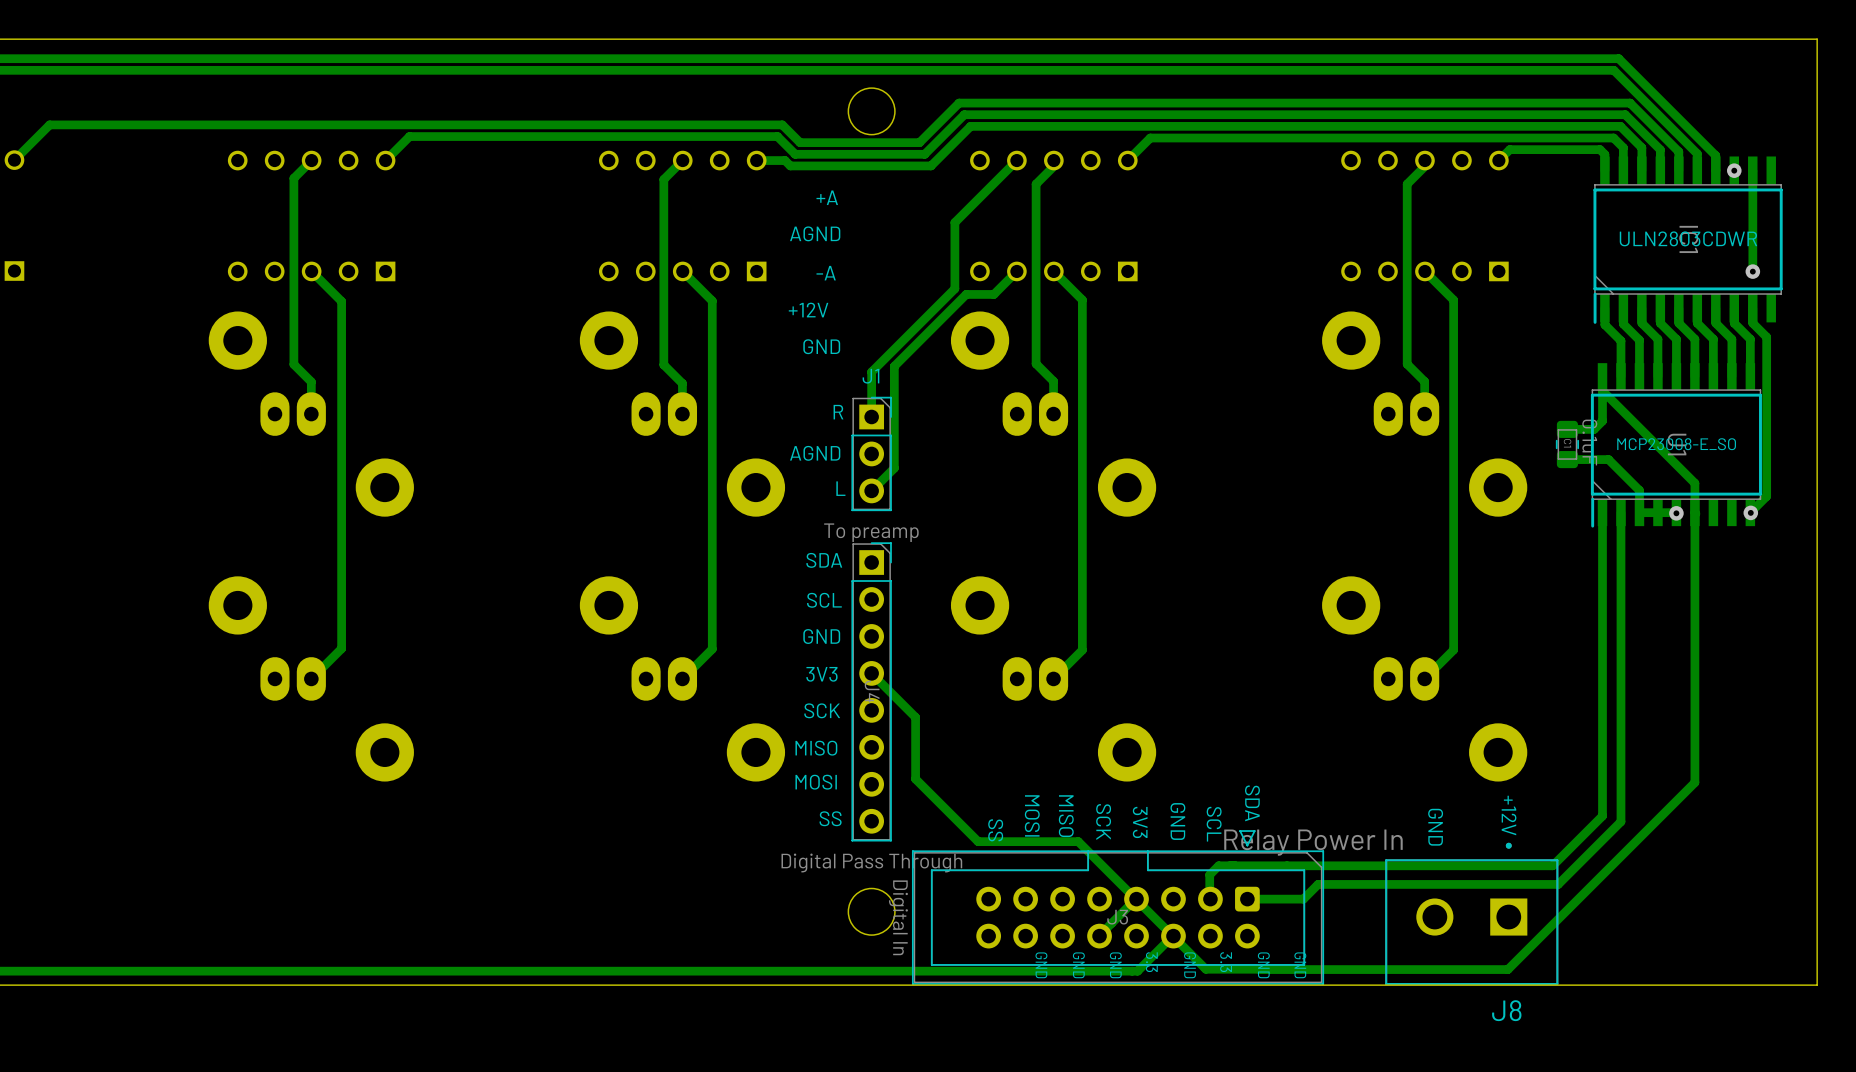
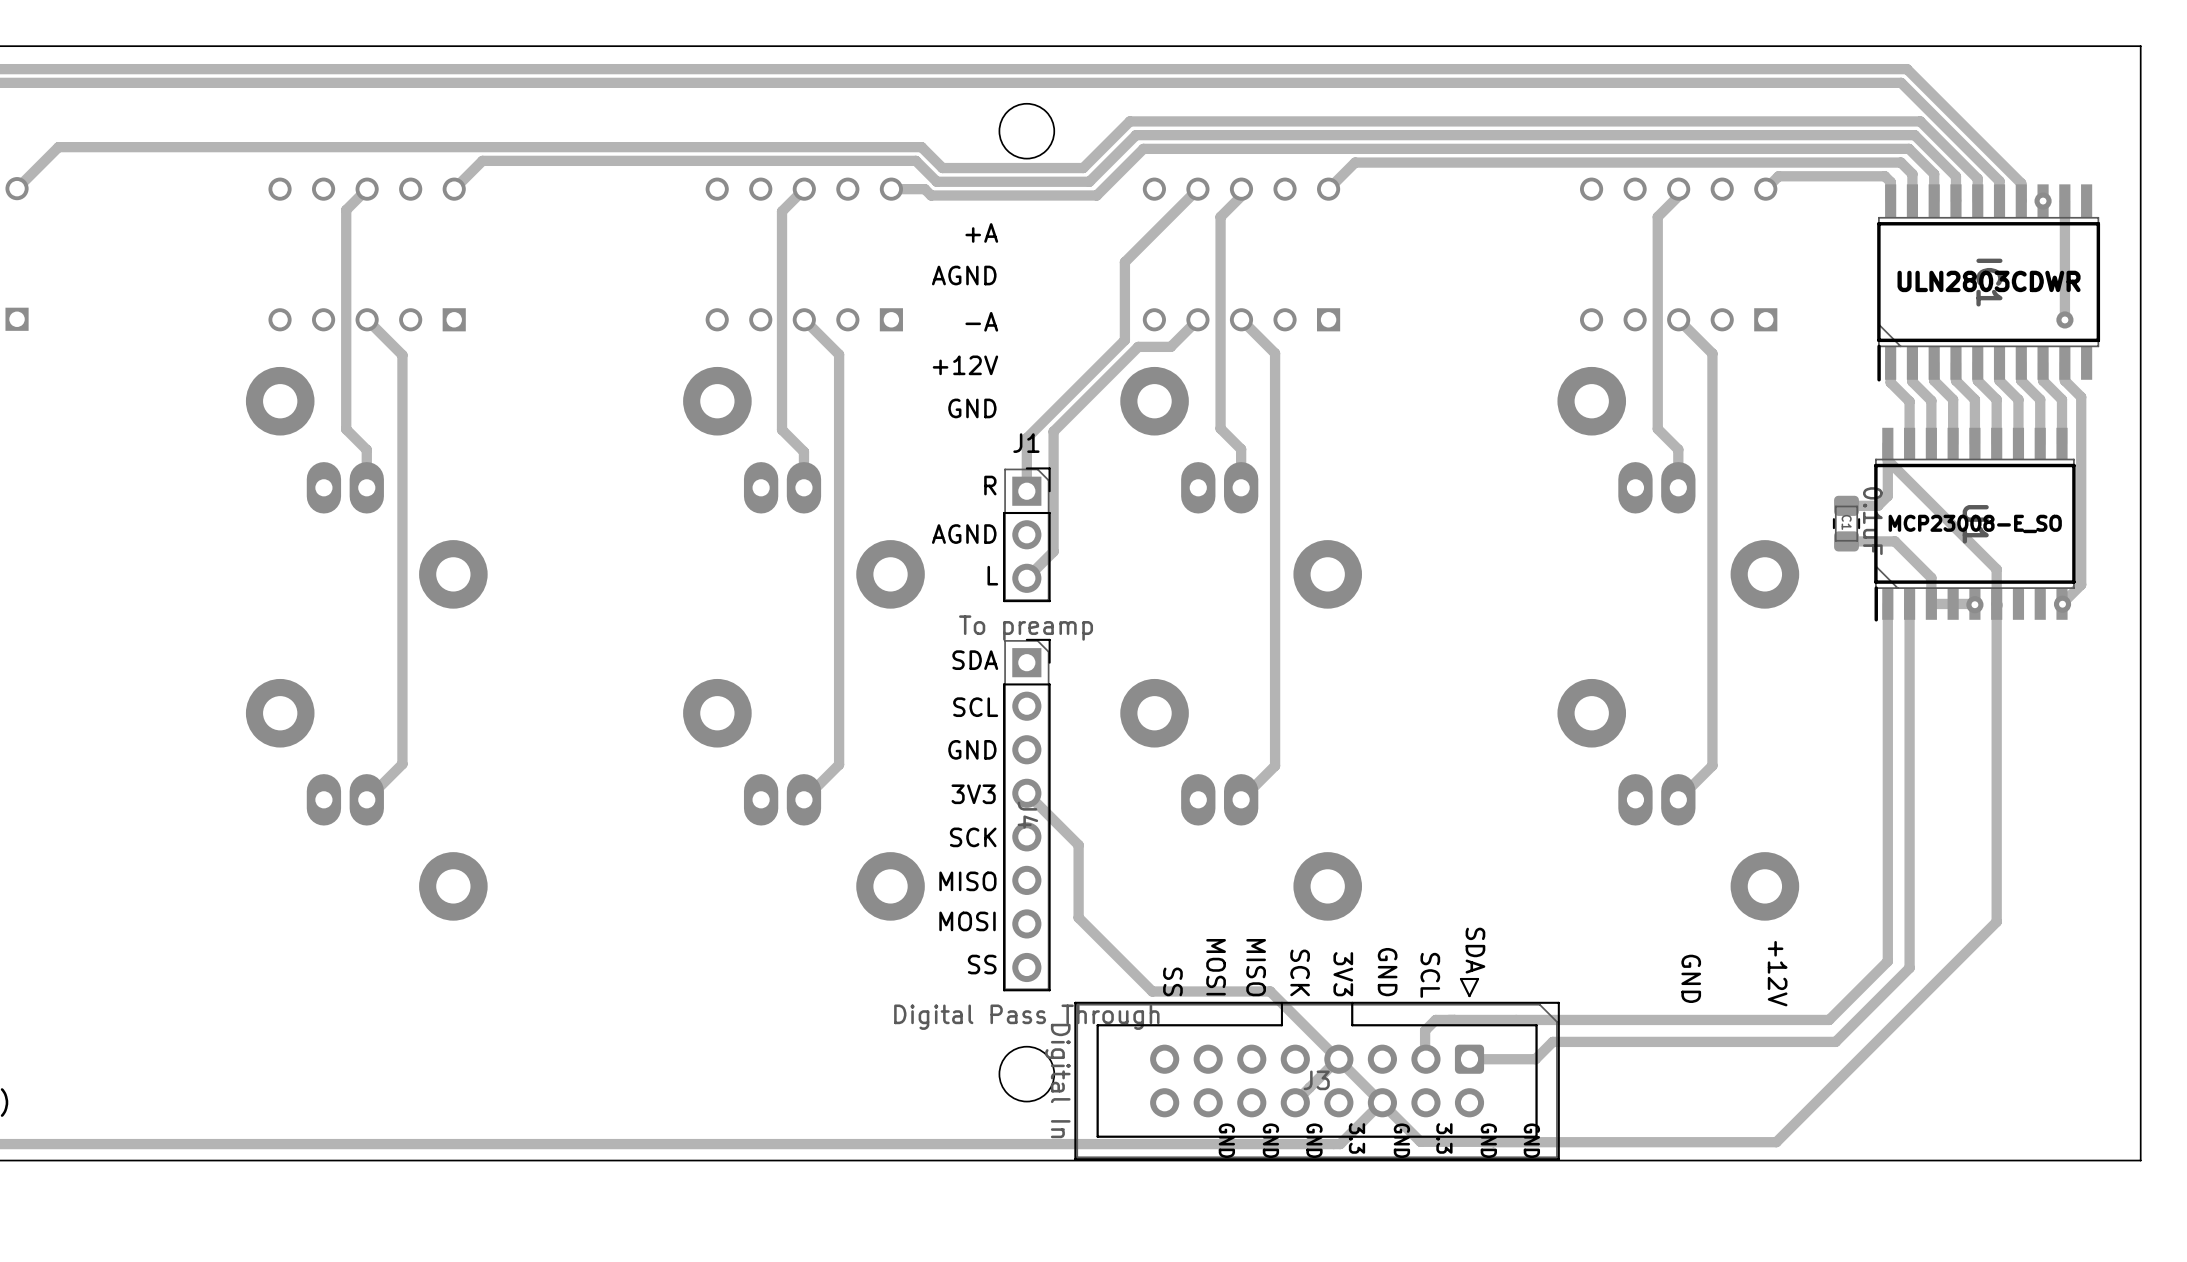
J8: Relay Power In (1471, 913) -> none

